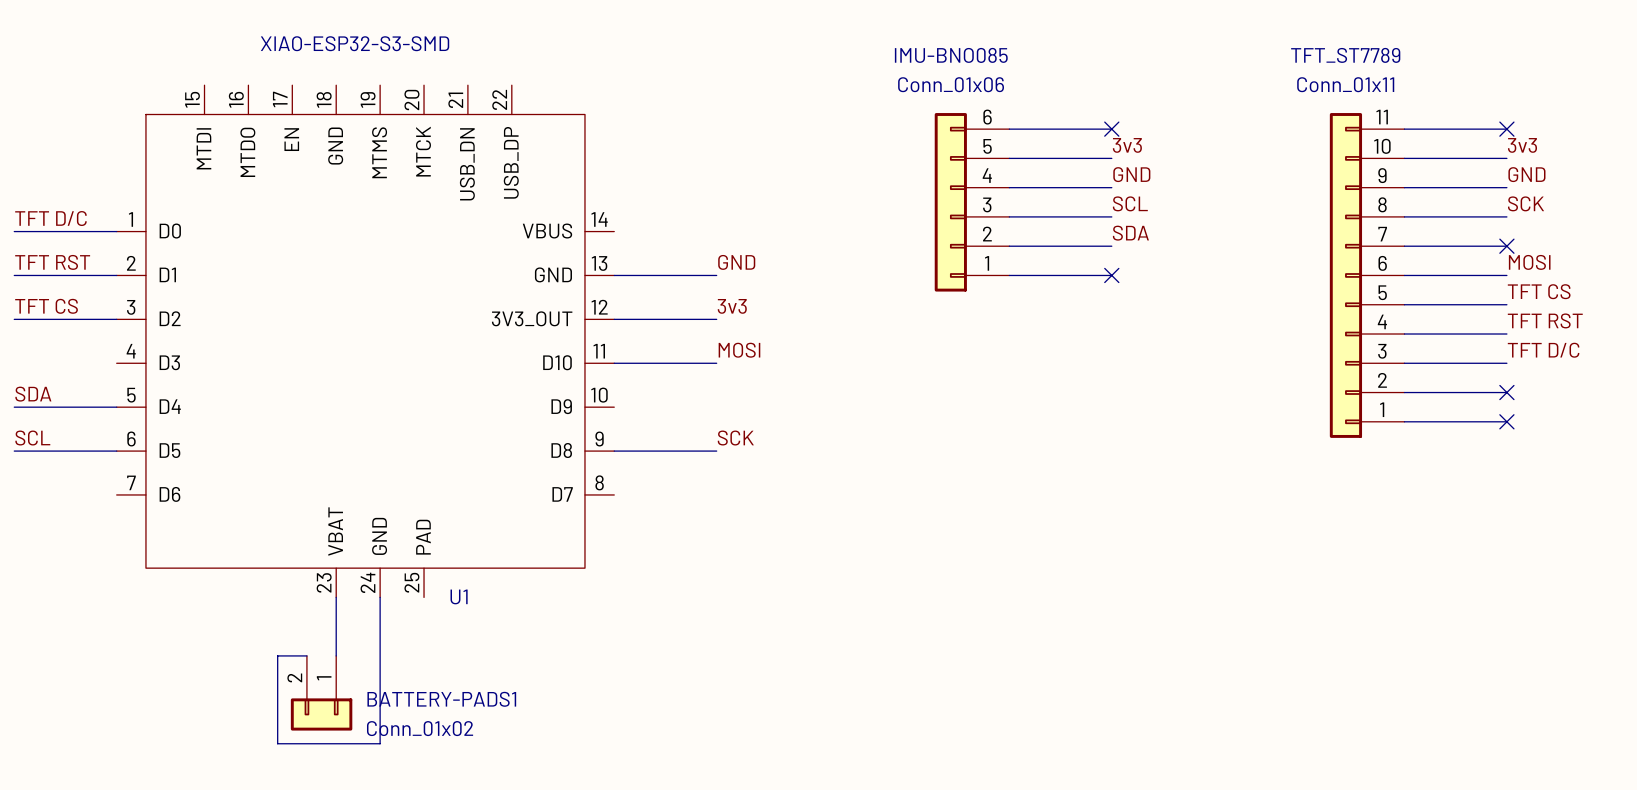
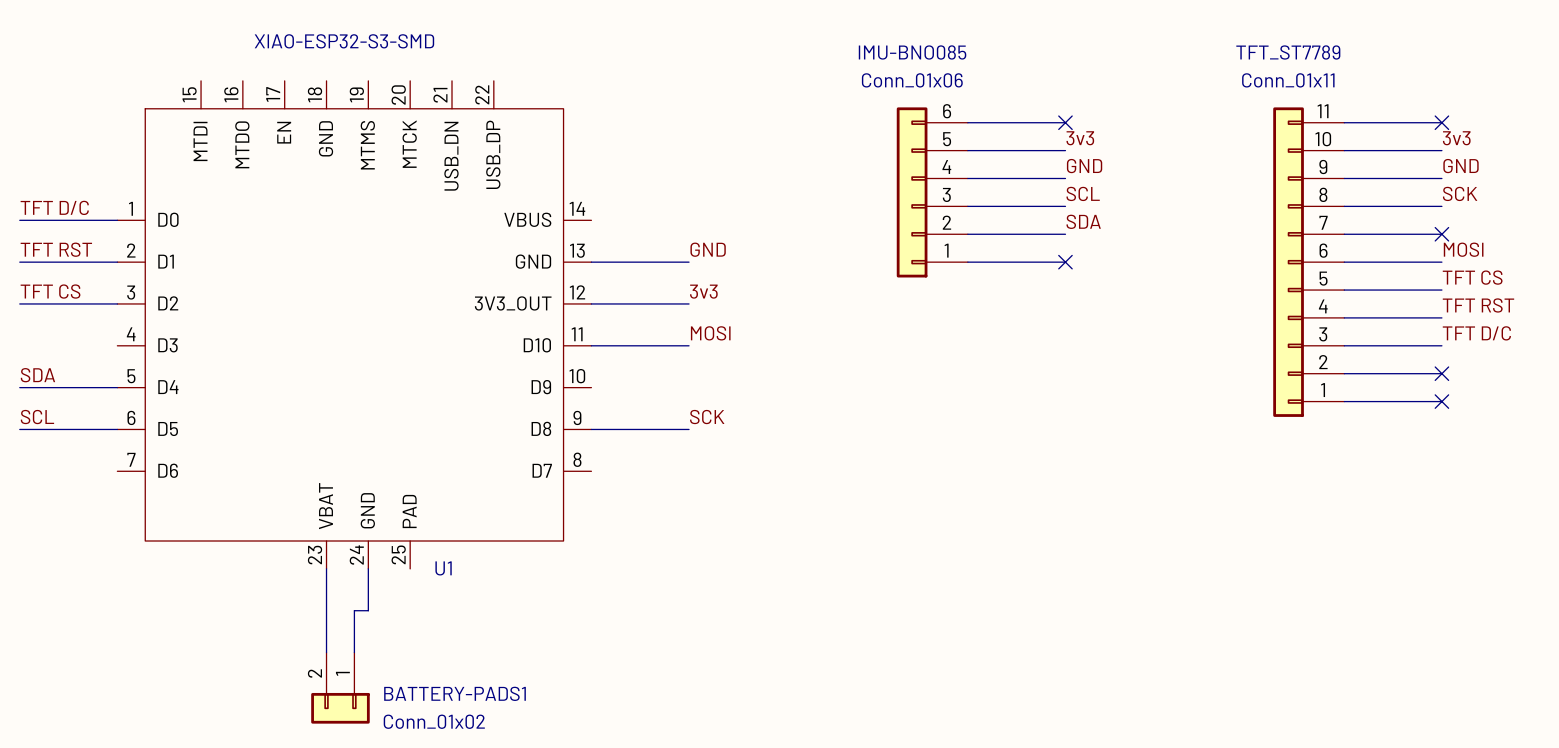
wire: (380, 641) (380, 743) (277, 743) (277, 655) (306, 655) -> (368, 610) (354, 610) (354, 652)
BATTERY-PADS1 position: (321, 693) -> (340, 688)

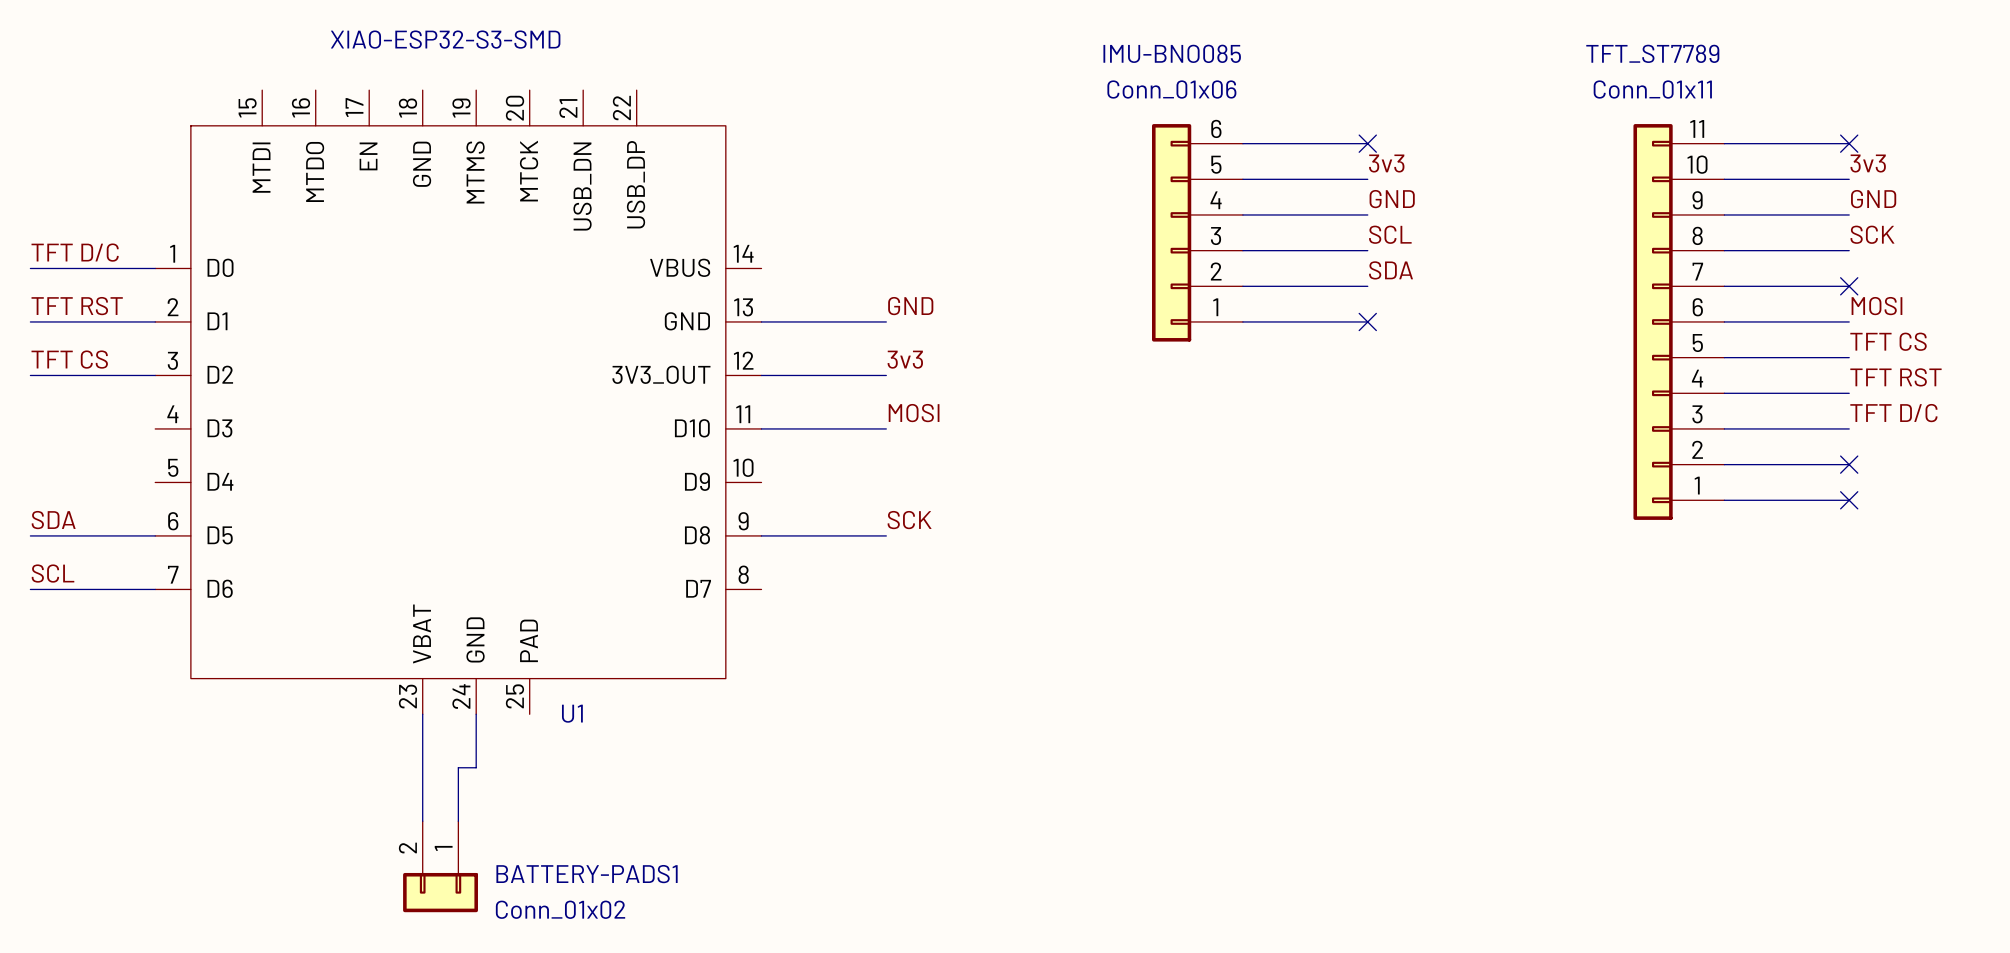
label: SDA (37, 375) -> none
wire: (19, 387) (117, 387) -> (30, 589) (155, 589)
label: SCL (37, 417) -> SDA (53, 520)
label: none -> SCL (53, 573)

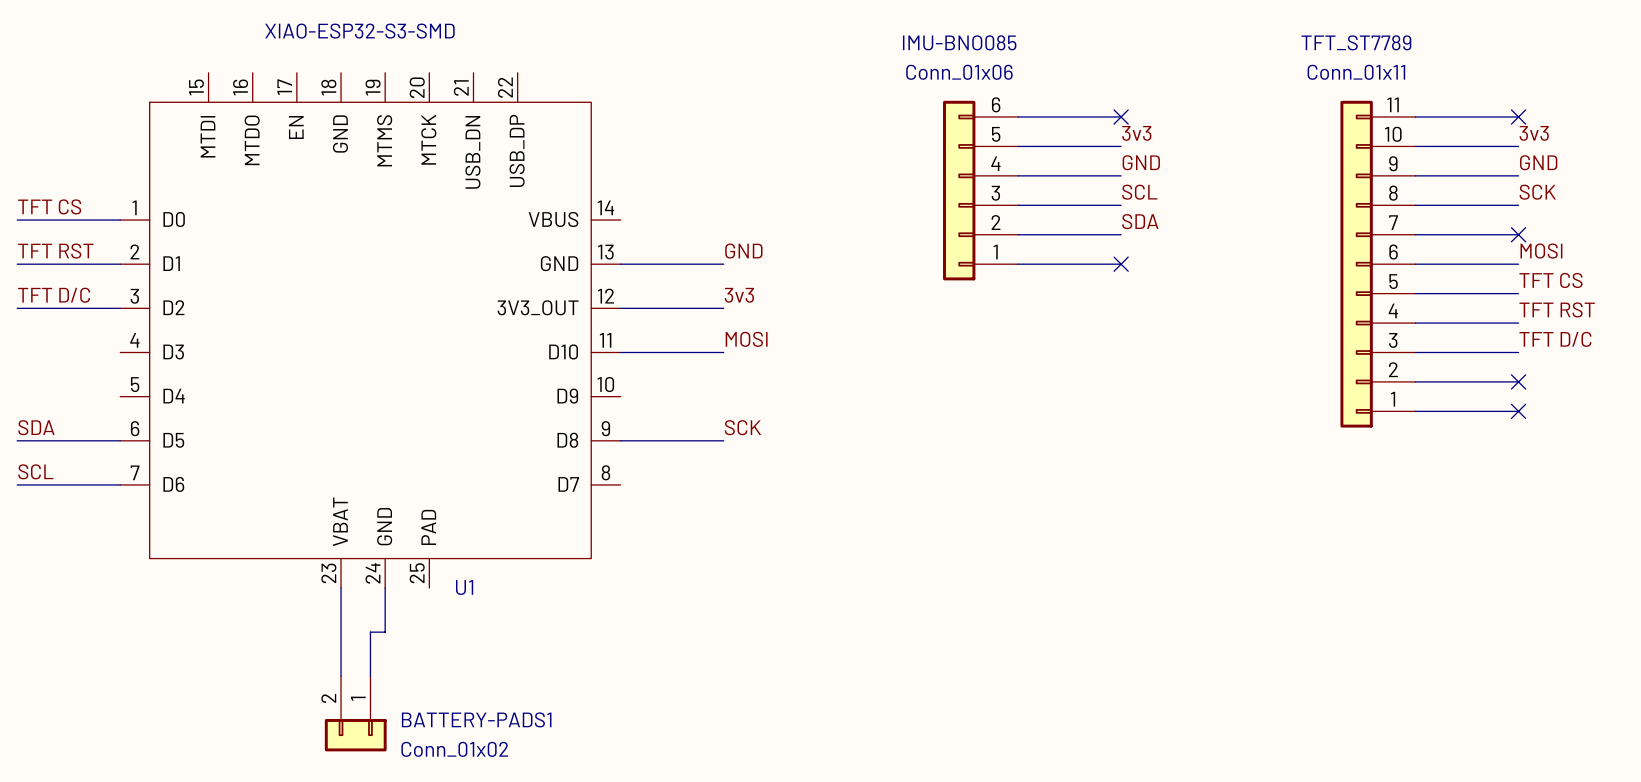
label: TFT D/C (75, 252) -> TFT CS (49, 206)
label: TFT CS (69, 359) -> TFT D/C (54, 295)

